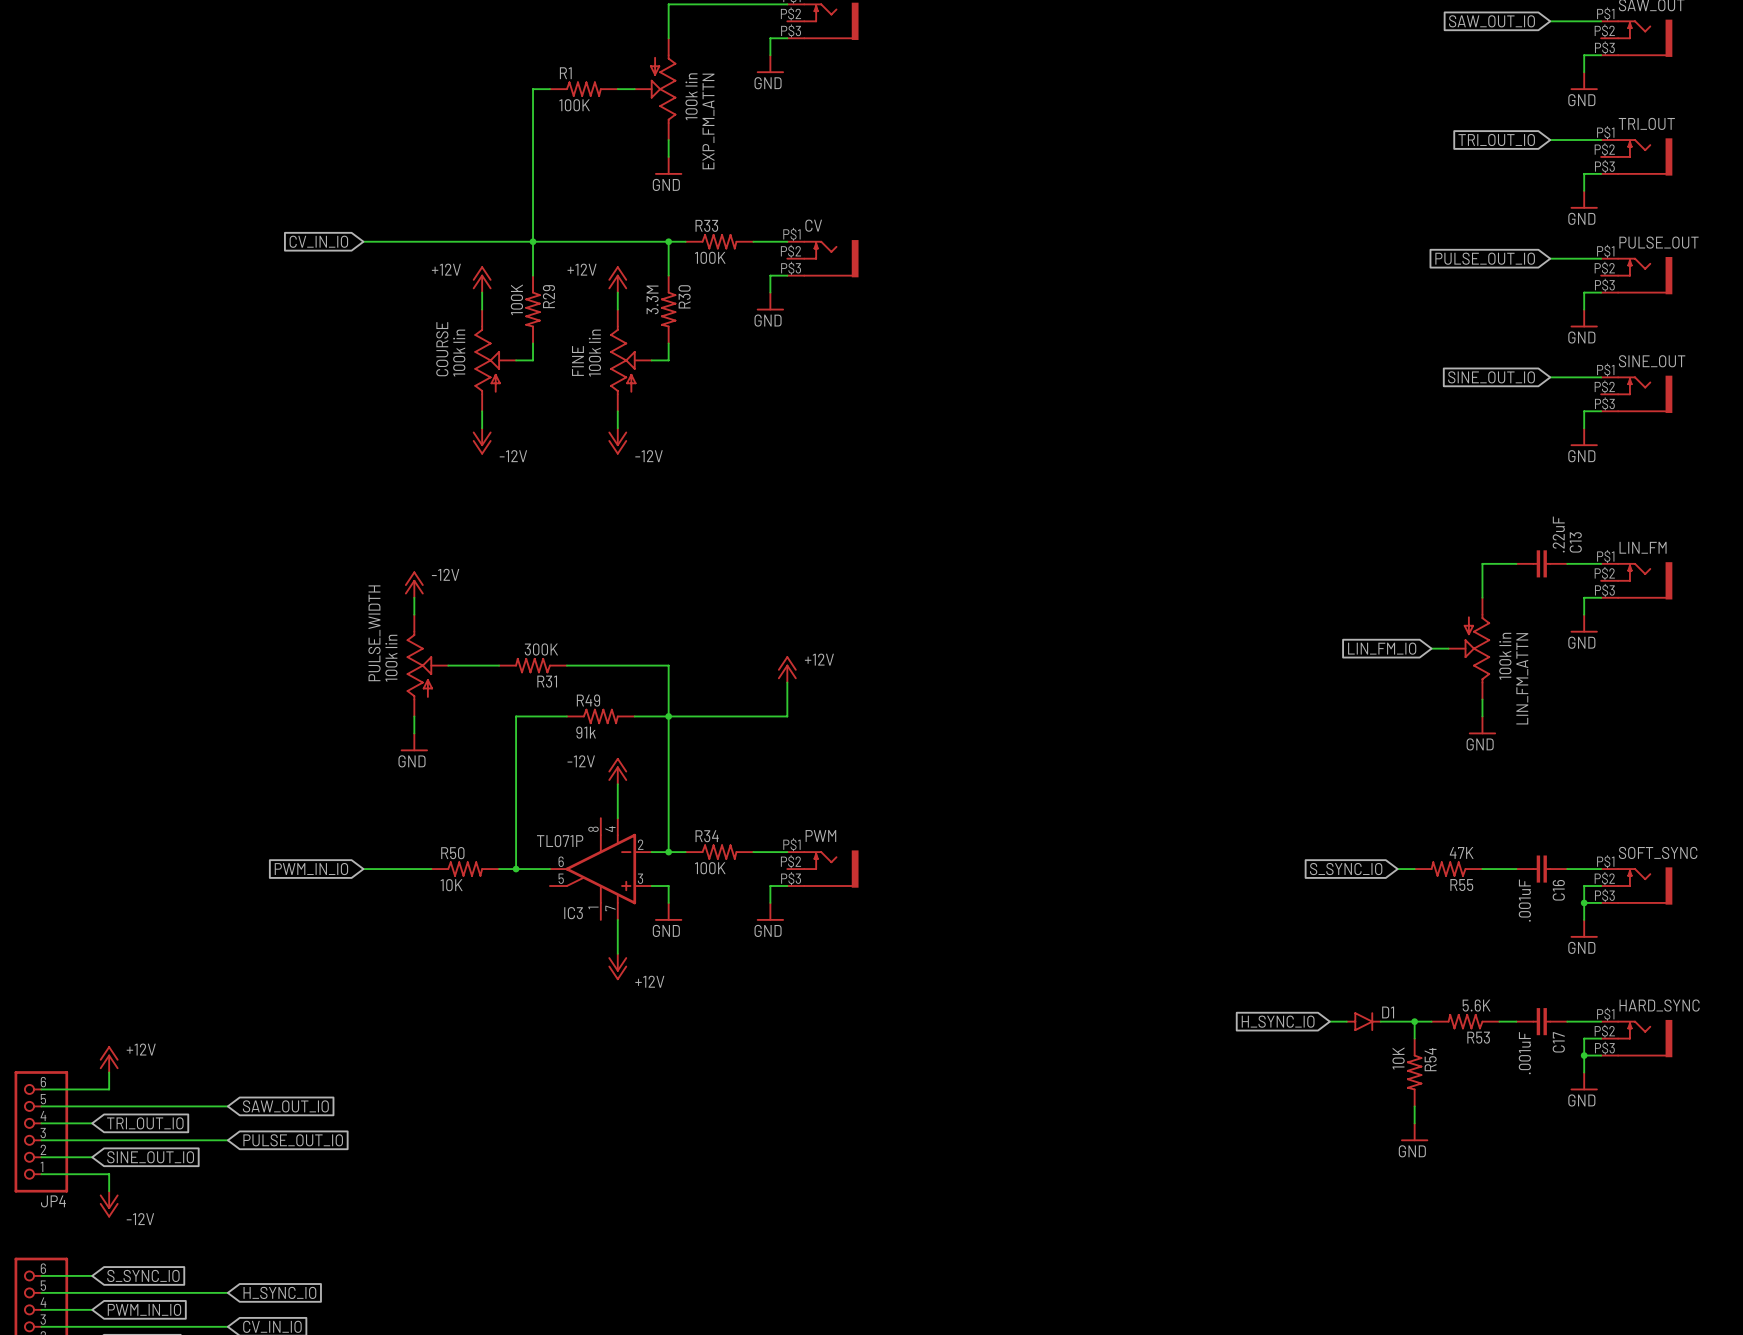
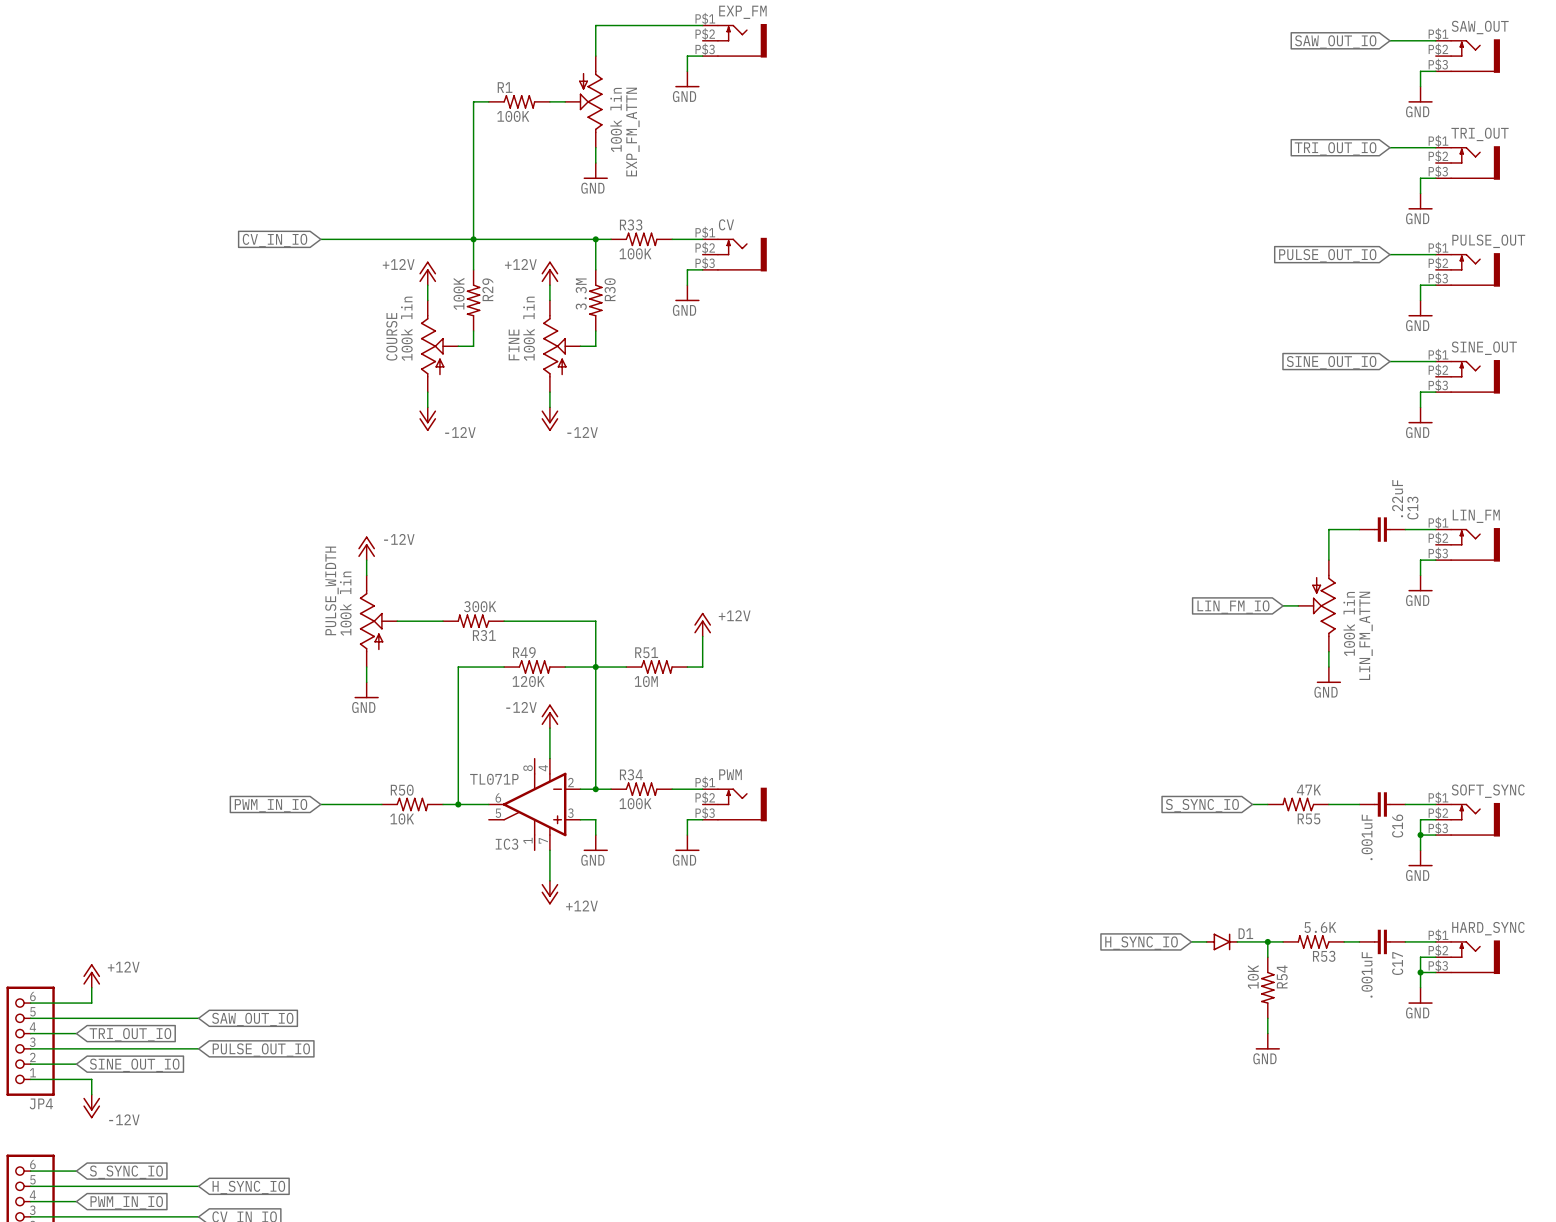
R51: none -> 10M (656, 667)
R49 value: 91k (586, 732) -> 120K (528, 681)

